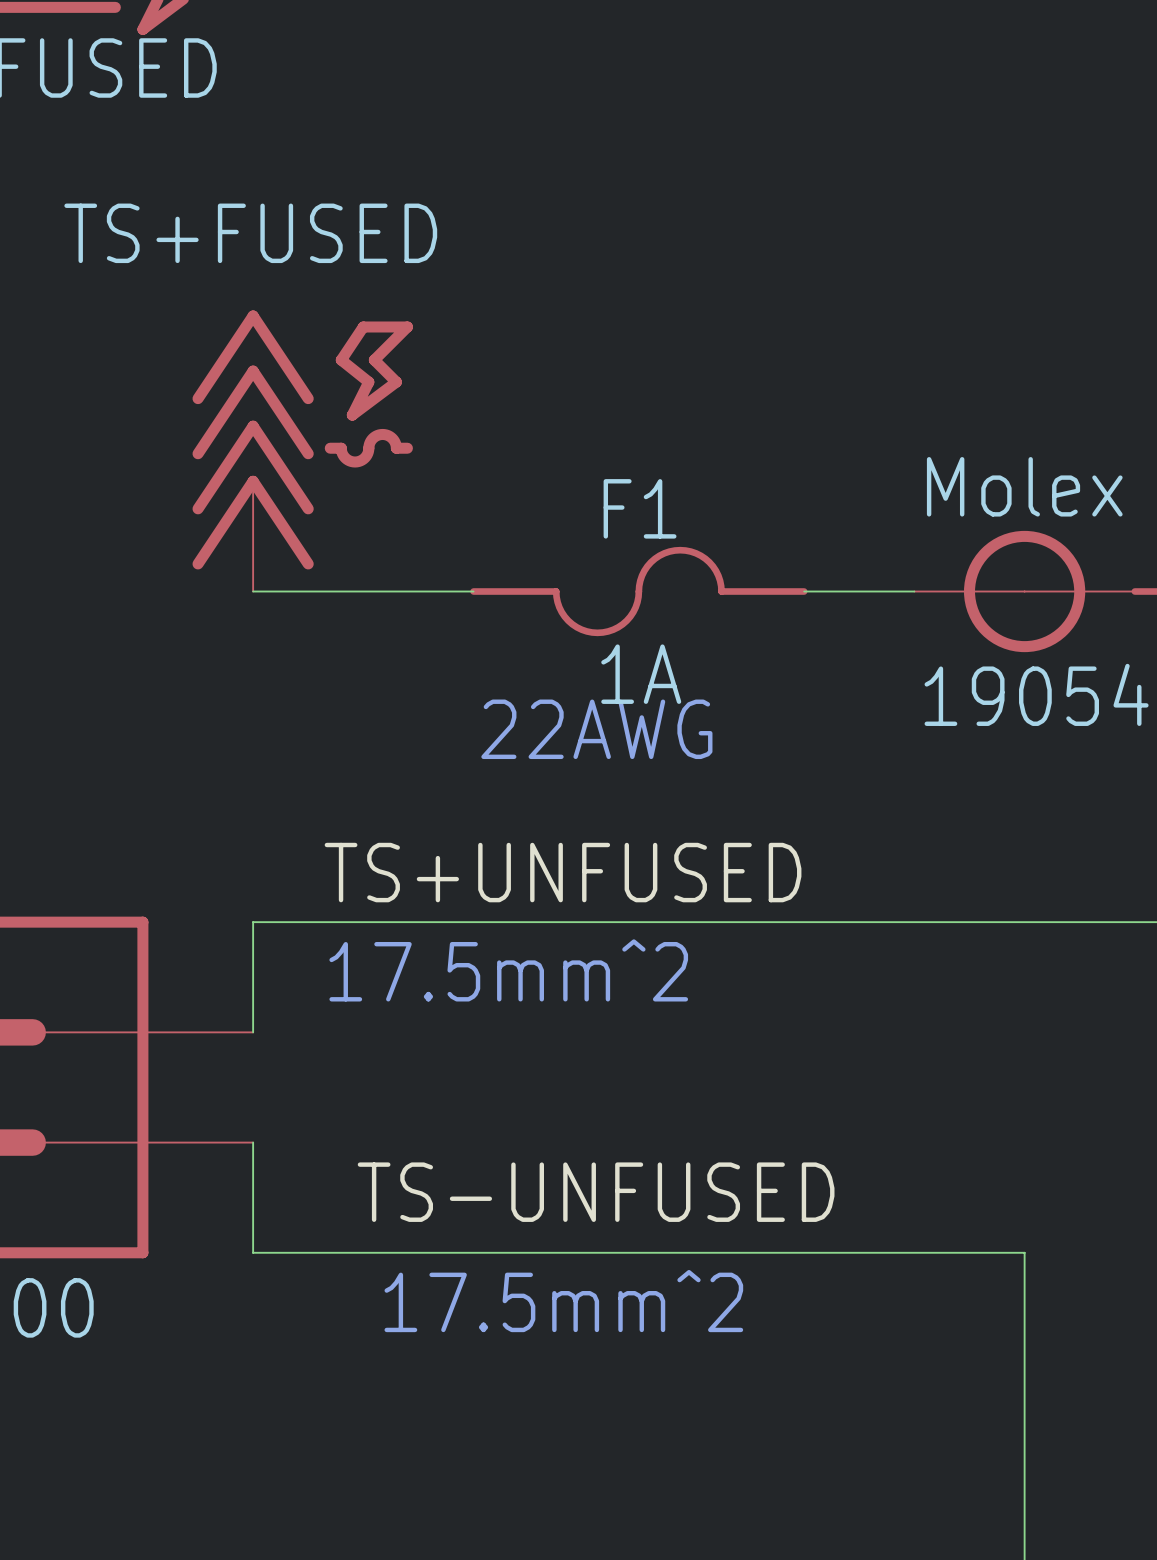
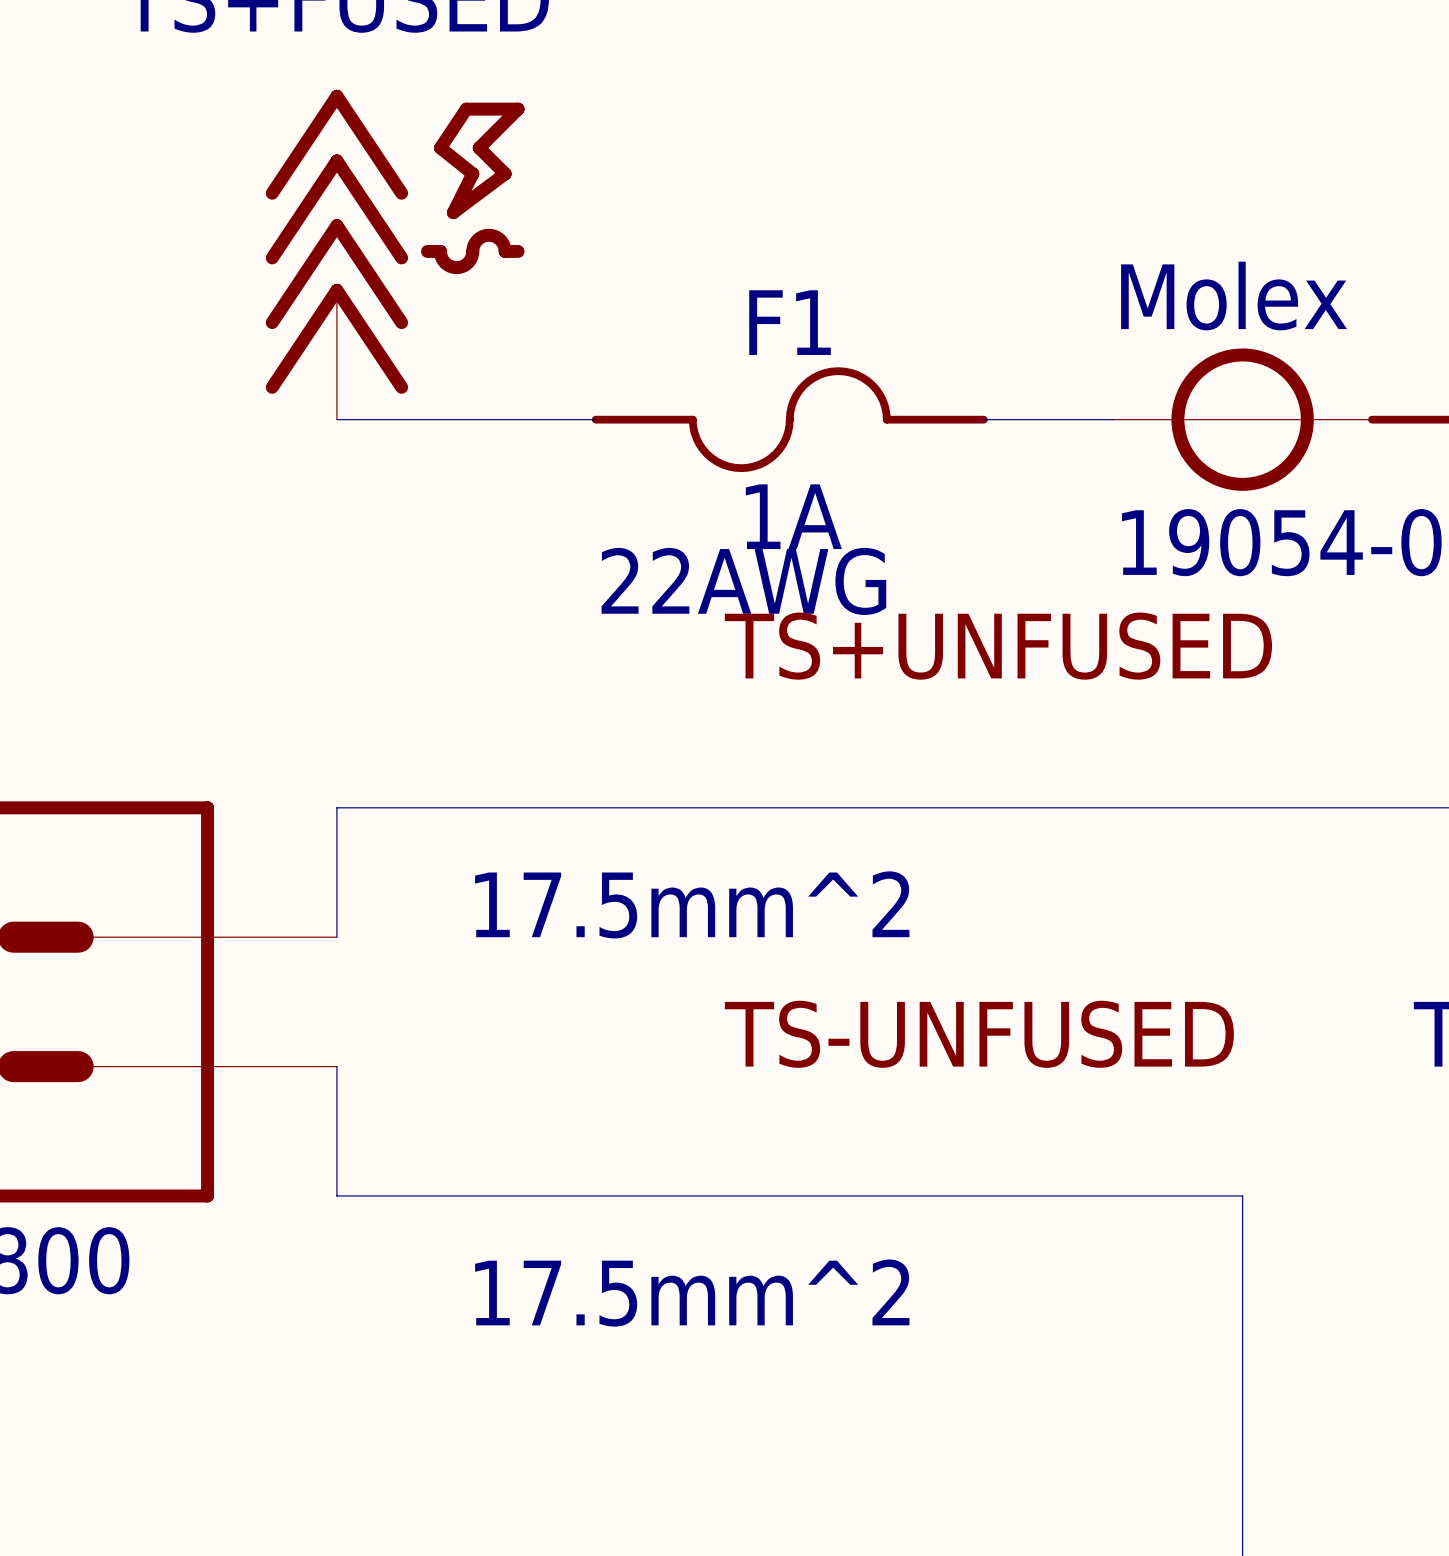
label position: TS+UNFUSED (563, 872) -> TS+UNFUSED (998, 646)
text position: 17.5mm^2 (508, 970) -> 17.5mm^2 (692, 904)
label position: TS-UNFUSED (596, 1192) -> TS-UNFUSED (979, 1034)
text position: 17.5mm^2 (563, 1301) -> 17.5mm^2 (692, 1293)

